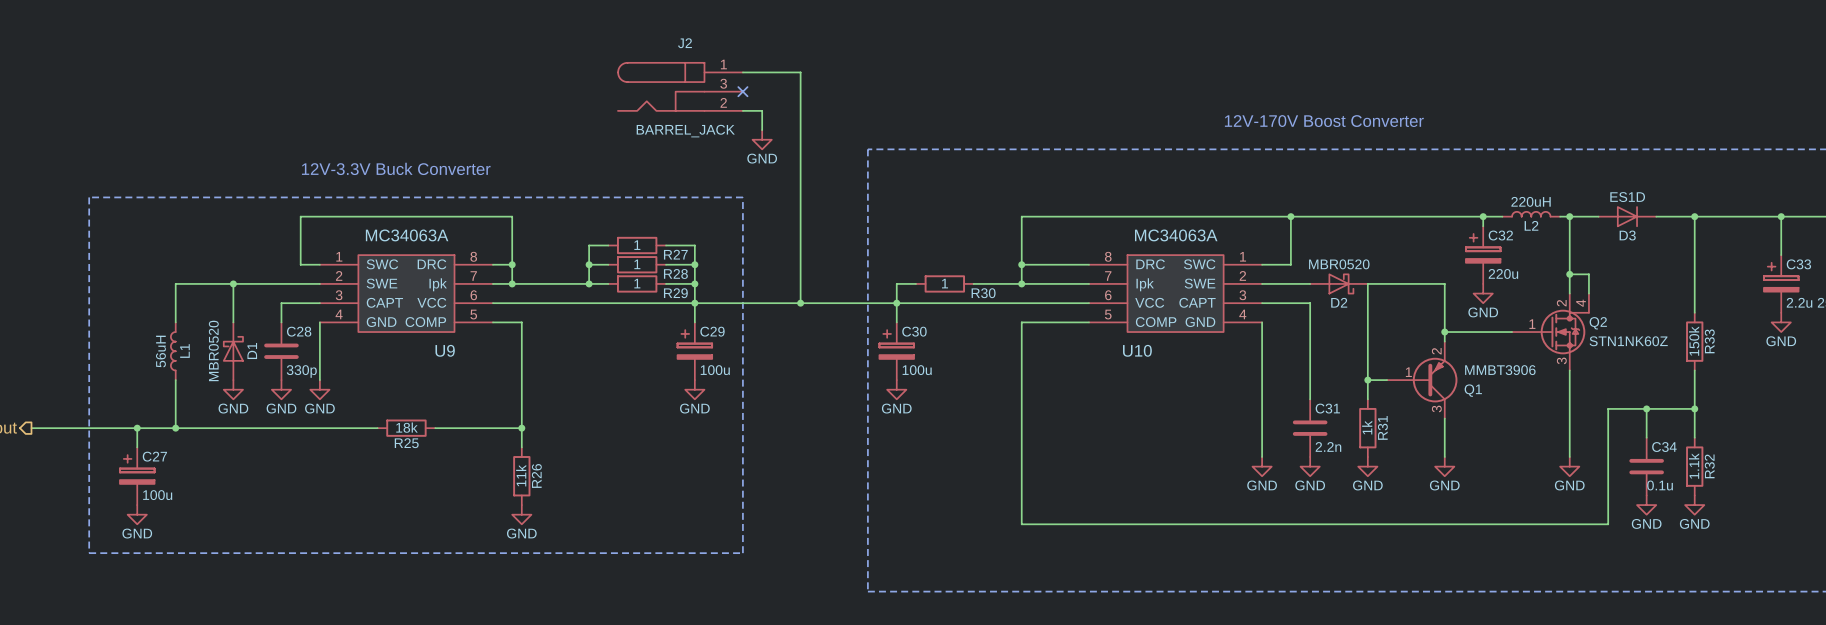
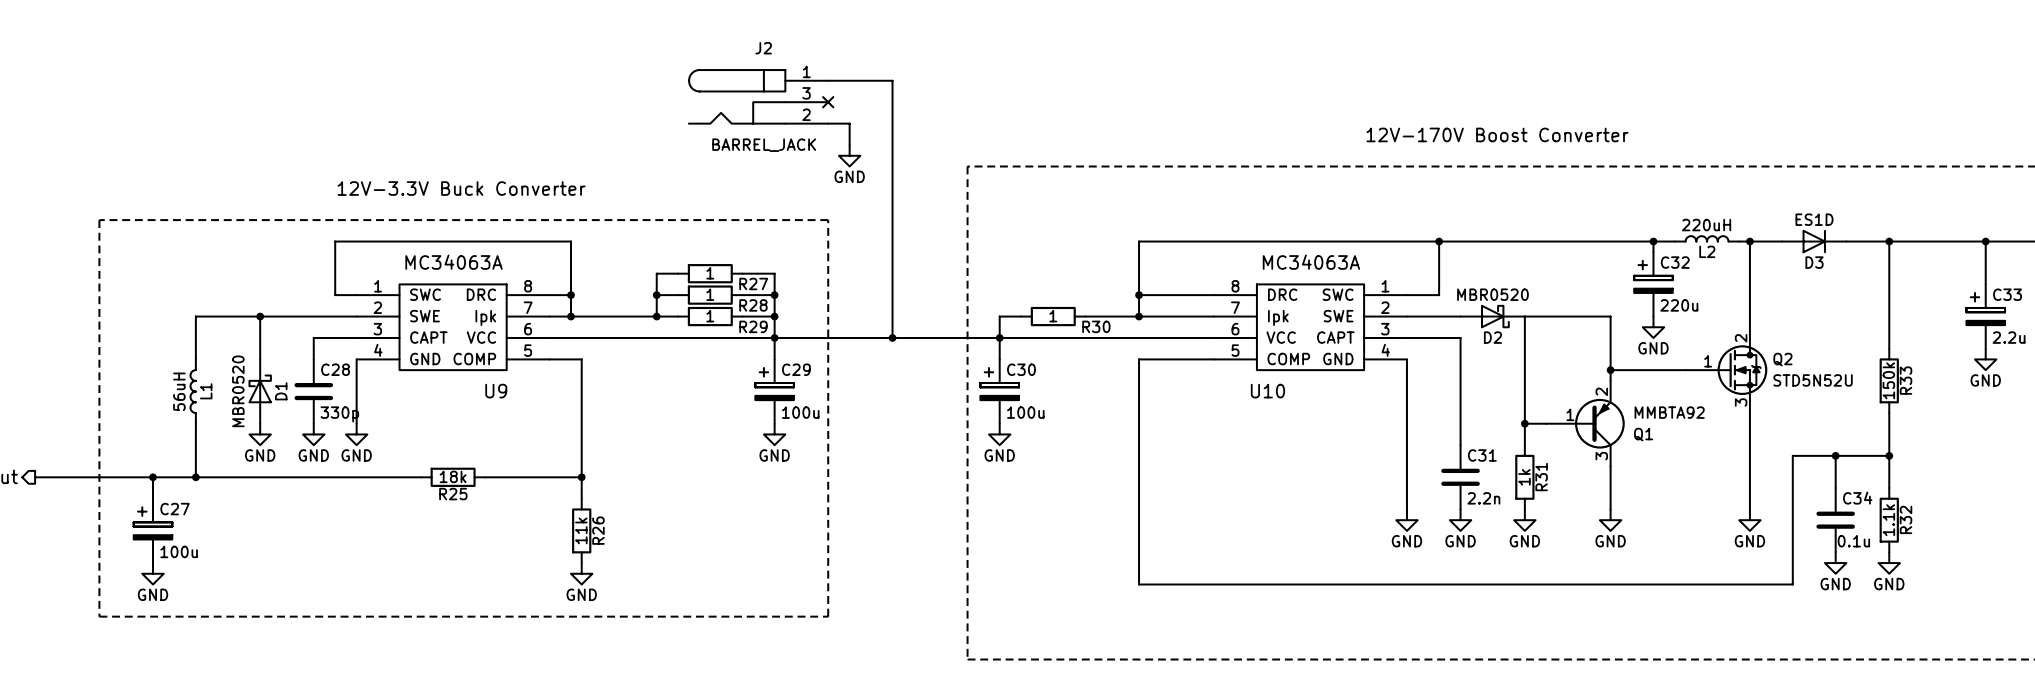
wire: (1569, 274) (1588, 274) (1588, 293) -> none
junction: (1569, 274) -> none
Q2 symbol: [1512, 293, 1589, 371] -> [1685, 327, 1768, 414]
Q2 value: STN1NK60Z (1628, 341) -> STD5N52U (1813, 380)
Q1 value: MMBT3906 (1500, 370) -> MMBTA92 (1669, 412)

